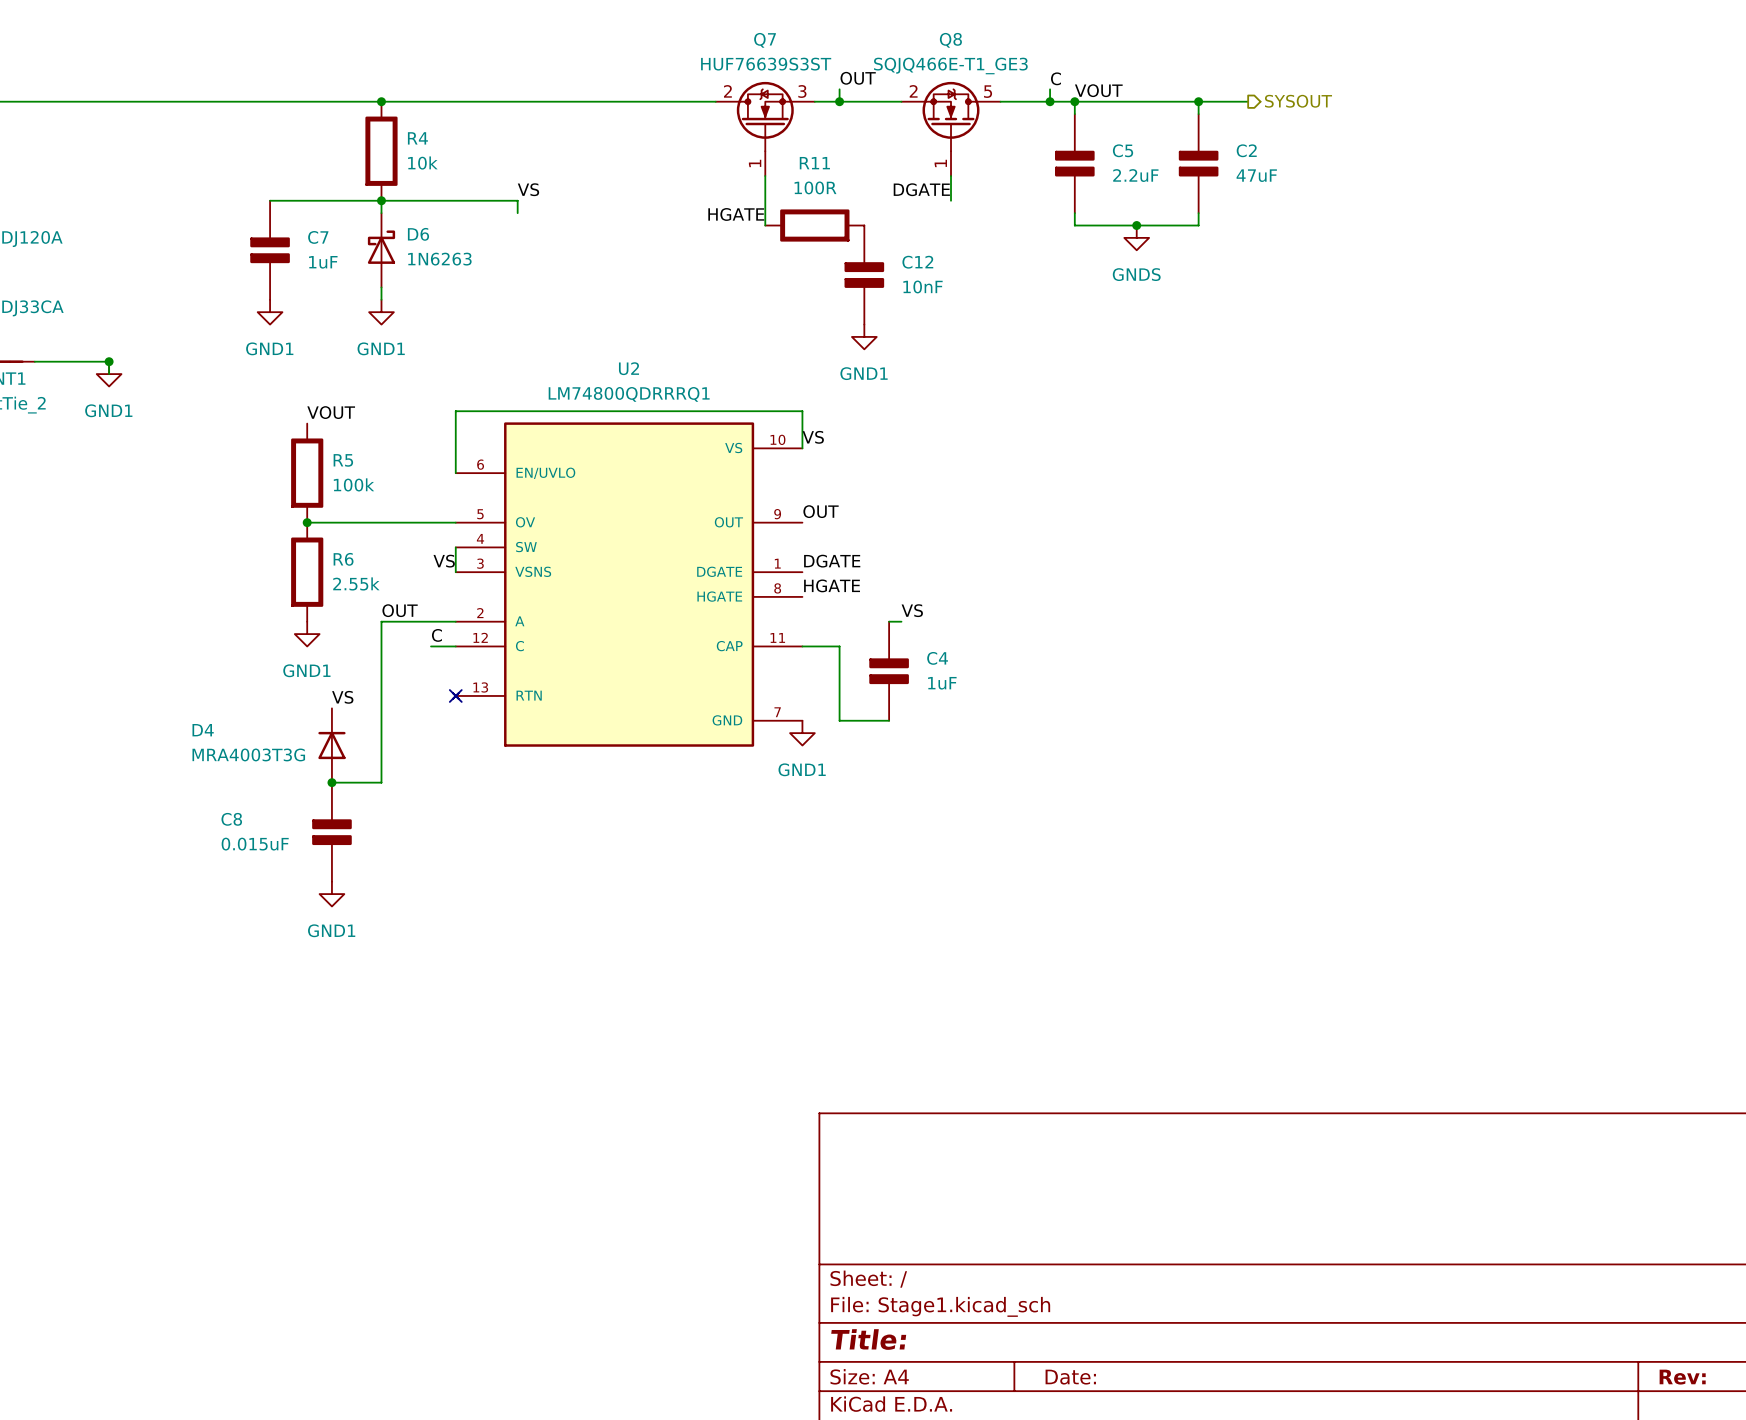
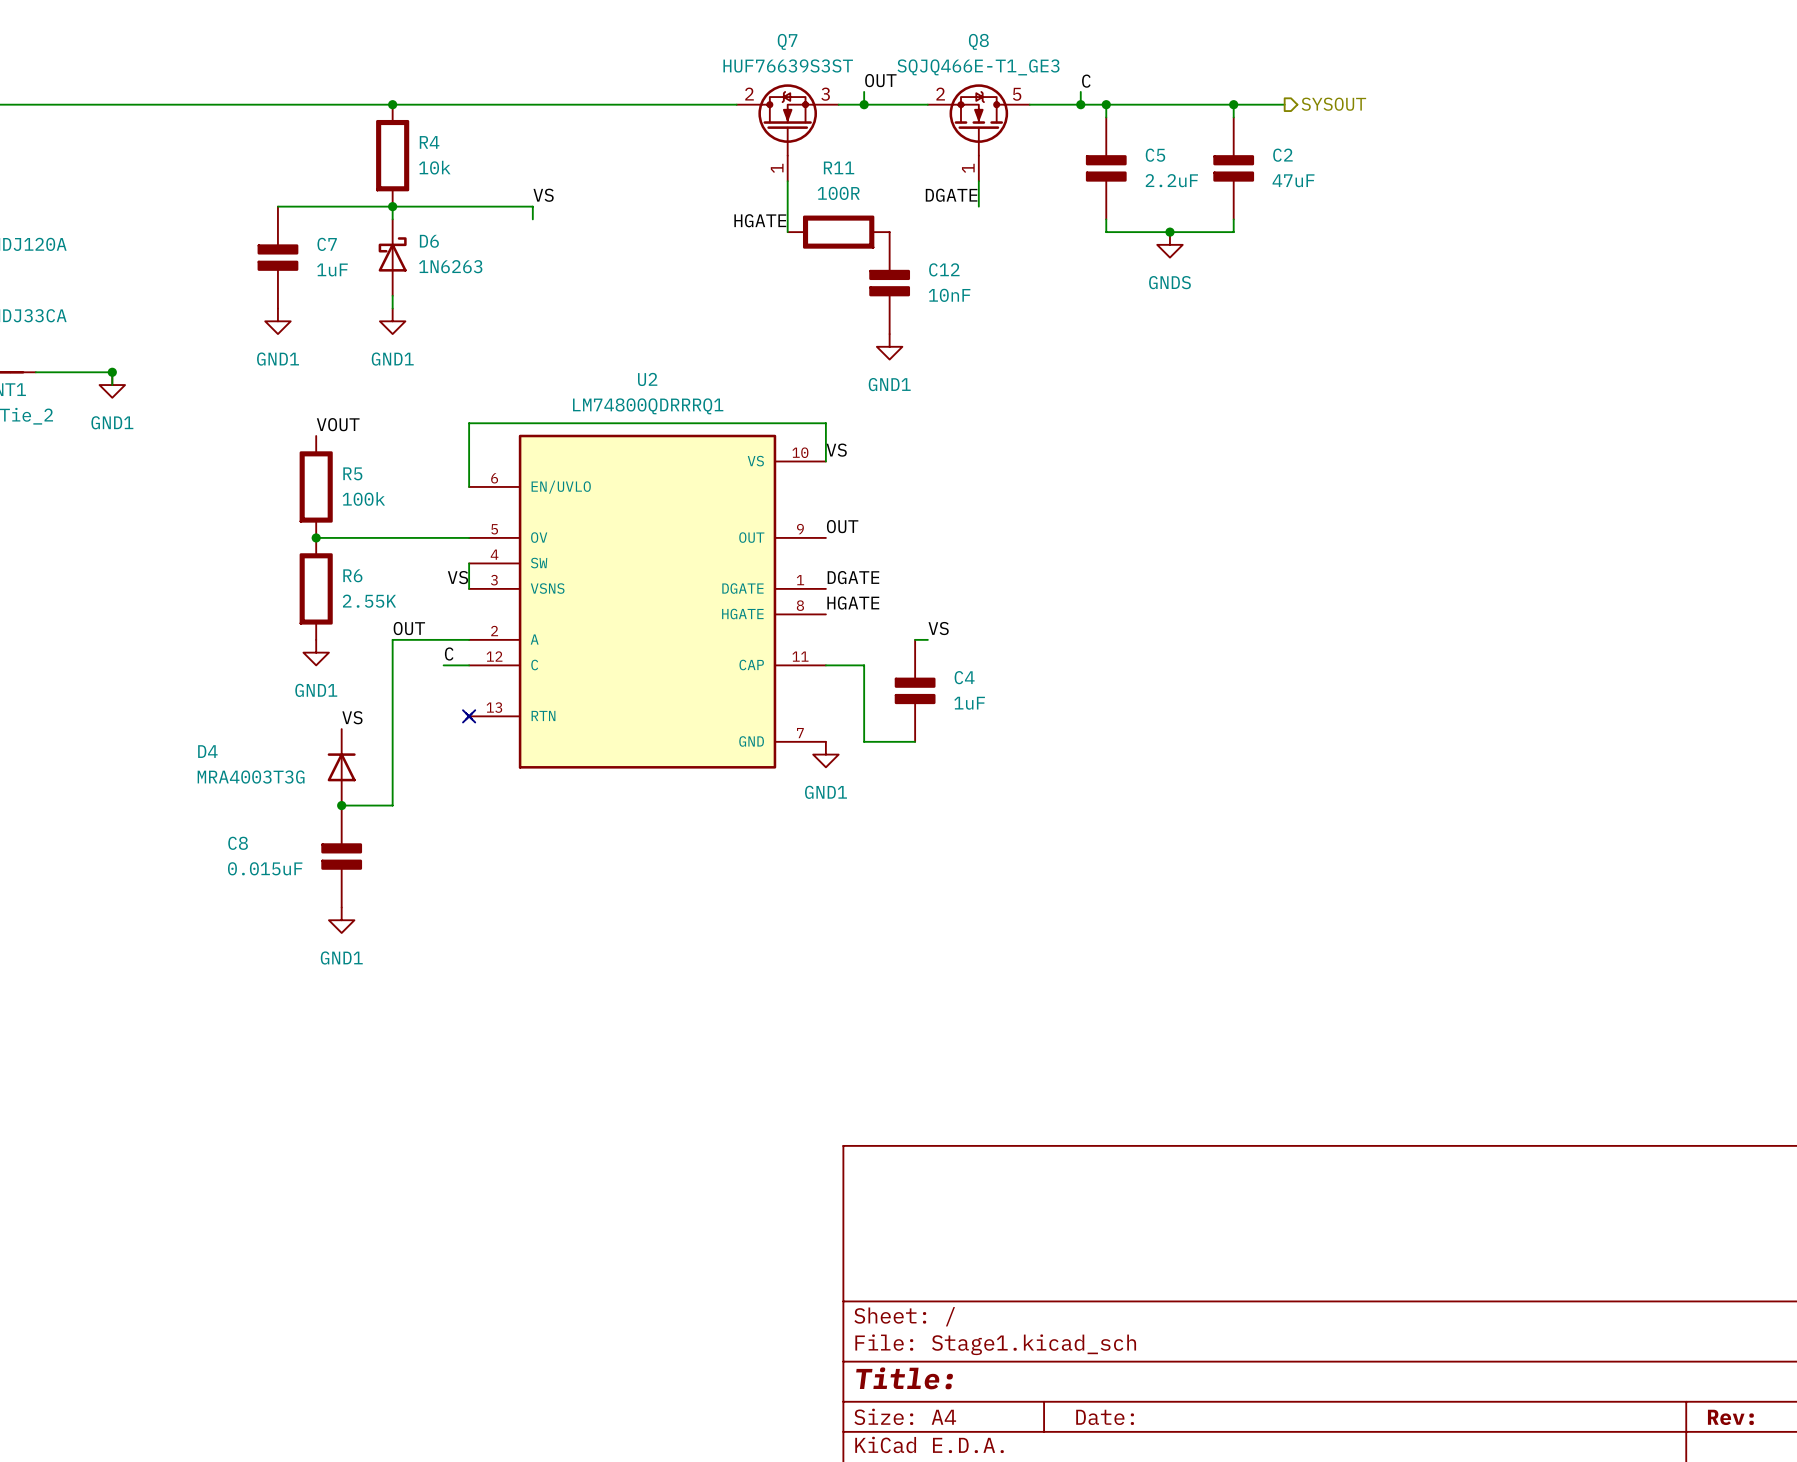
label: VOUT (1098, 90) -> none
R6 value: 2.55k (356, 583) -> 2.55K (369, 601)

